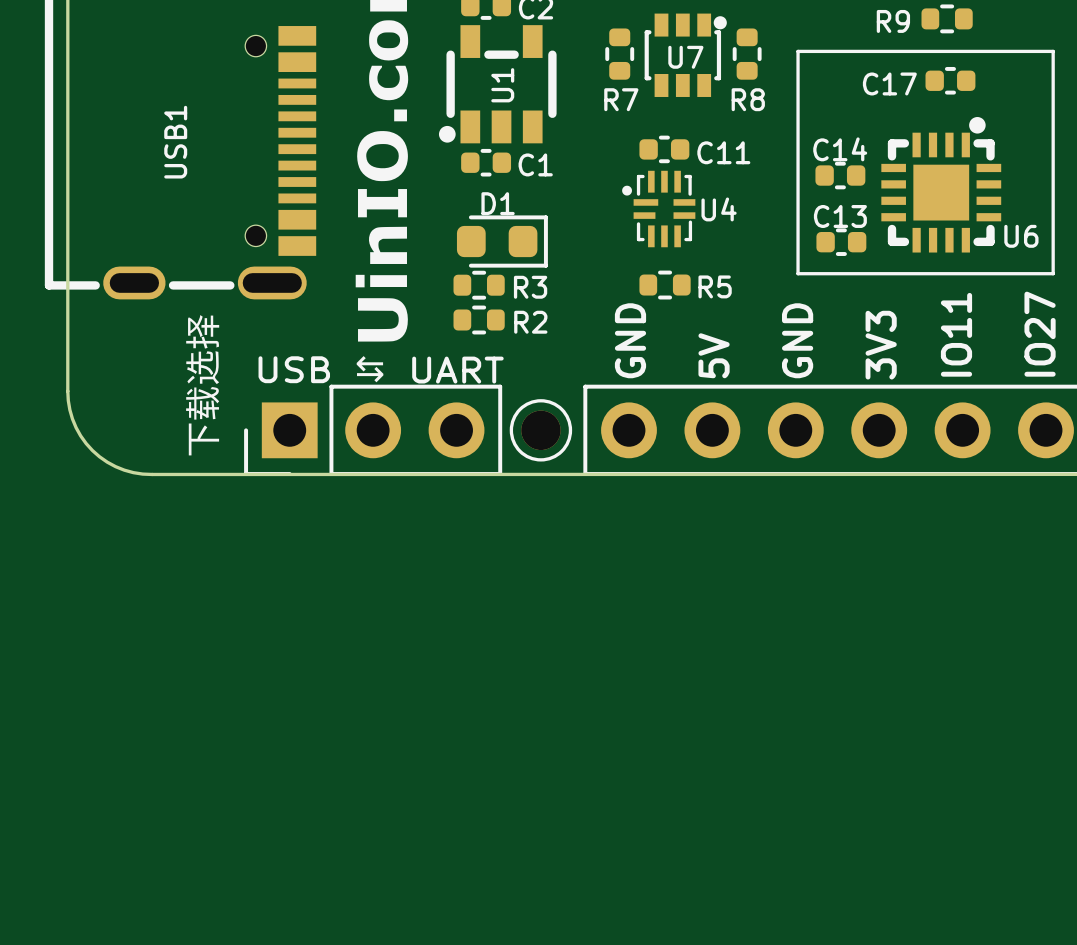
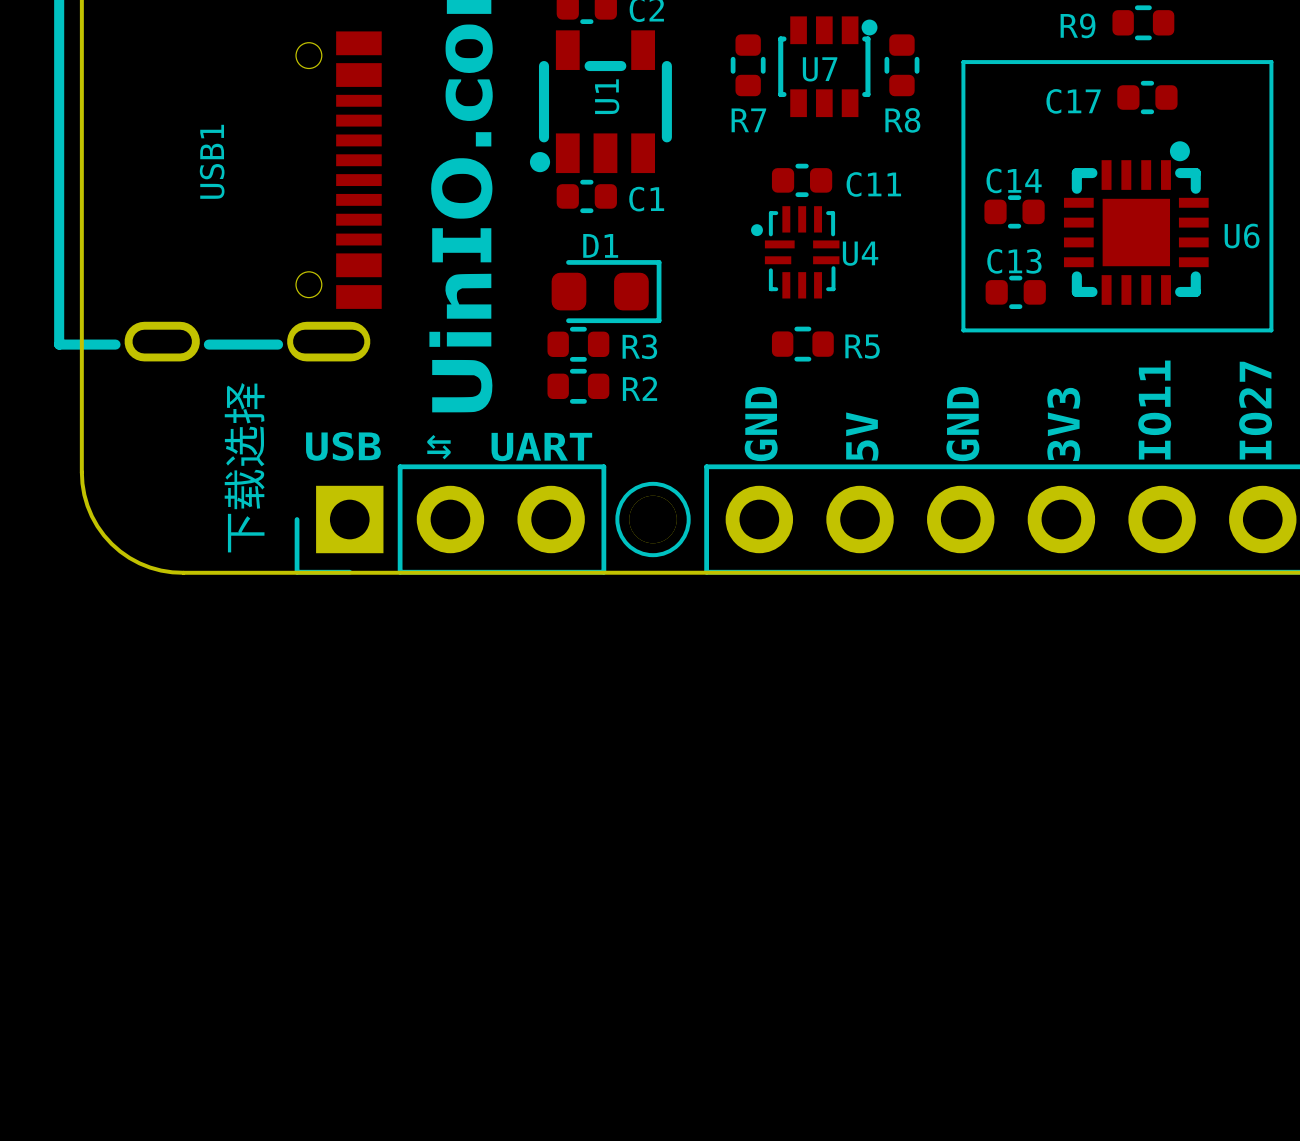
U6 name position: U6 (1021, 236) -> U6 (1242, 236)

